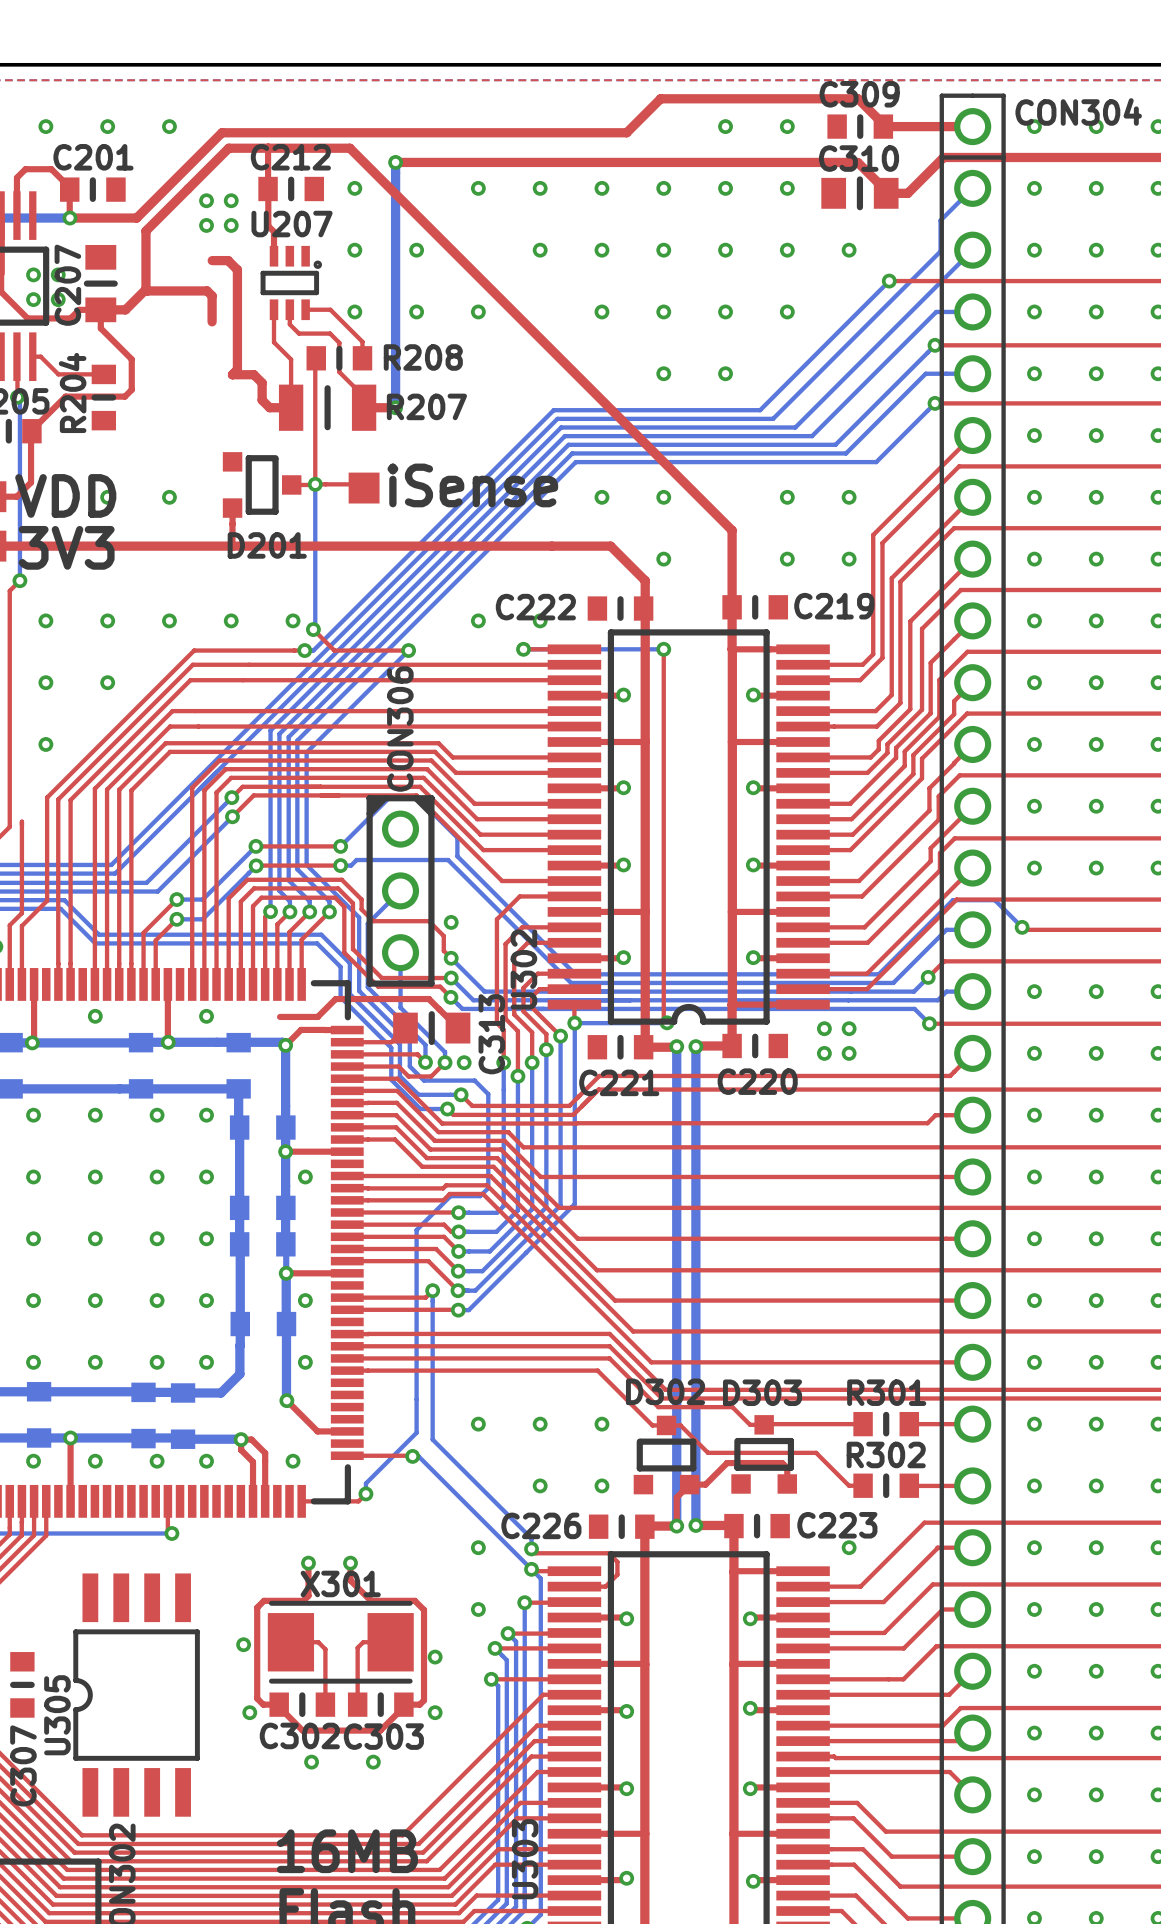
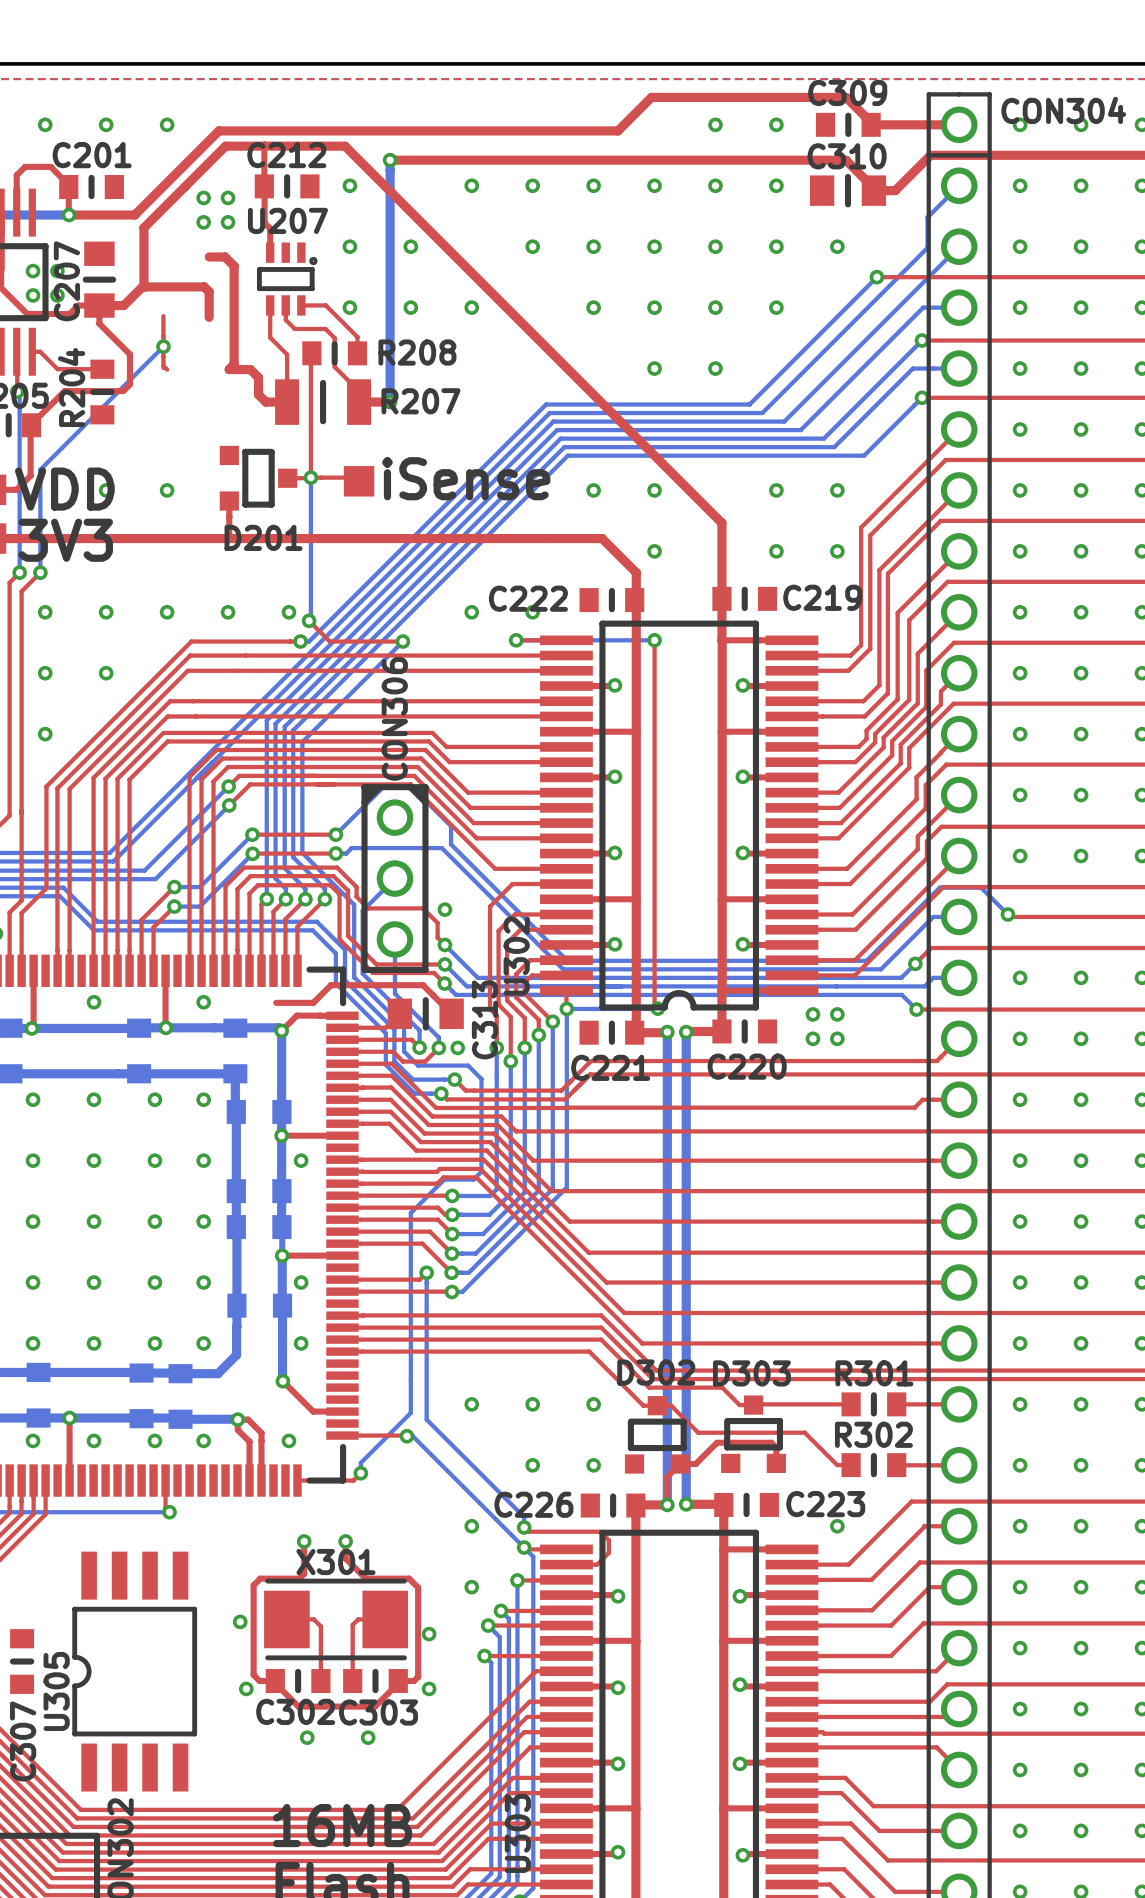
top track: none -> (163, 316) (163, 367)
bottom track: none -> (163, 346) (40, 469) (40, 572)
via: none -> (163, 346)
top track: none -> (163, 366) (167, 369)
top track: none -> (40, 572) (21, 591) (21, 810)
via: none -> (40, 572)

